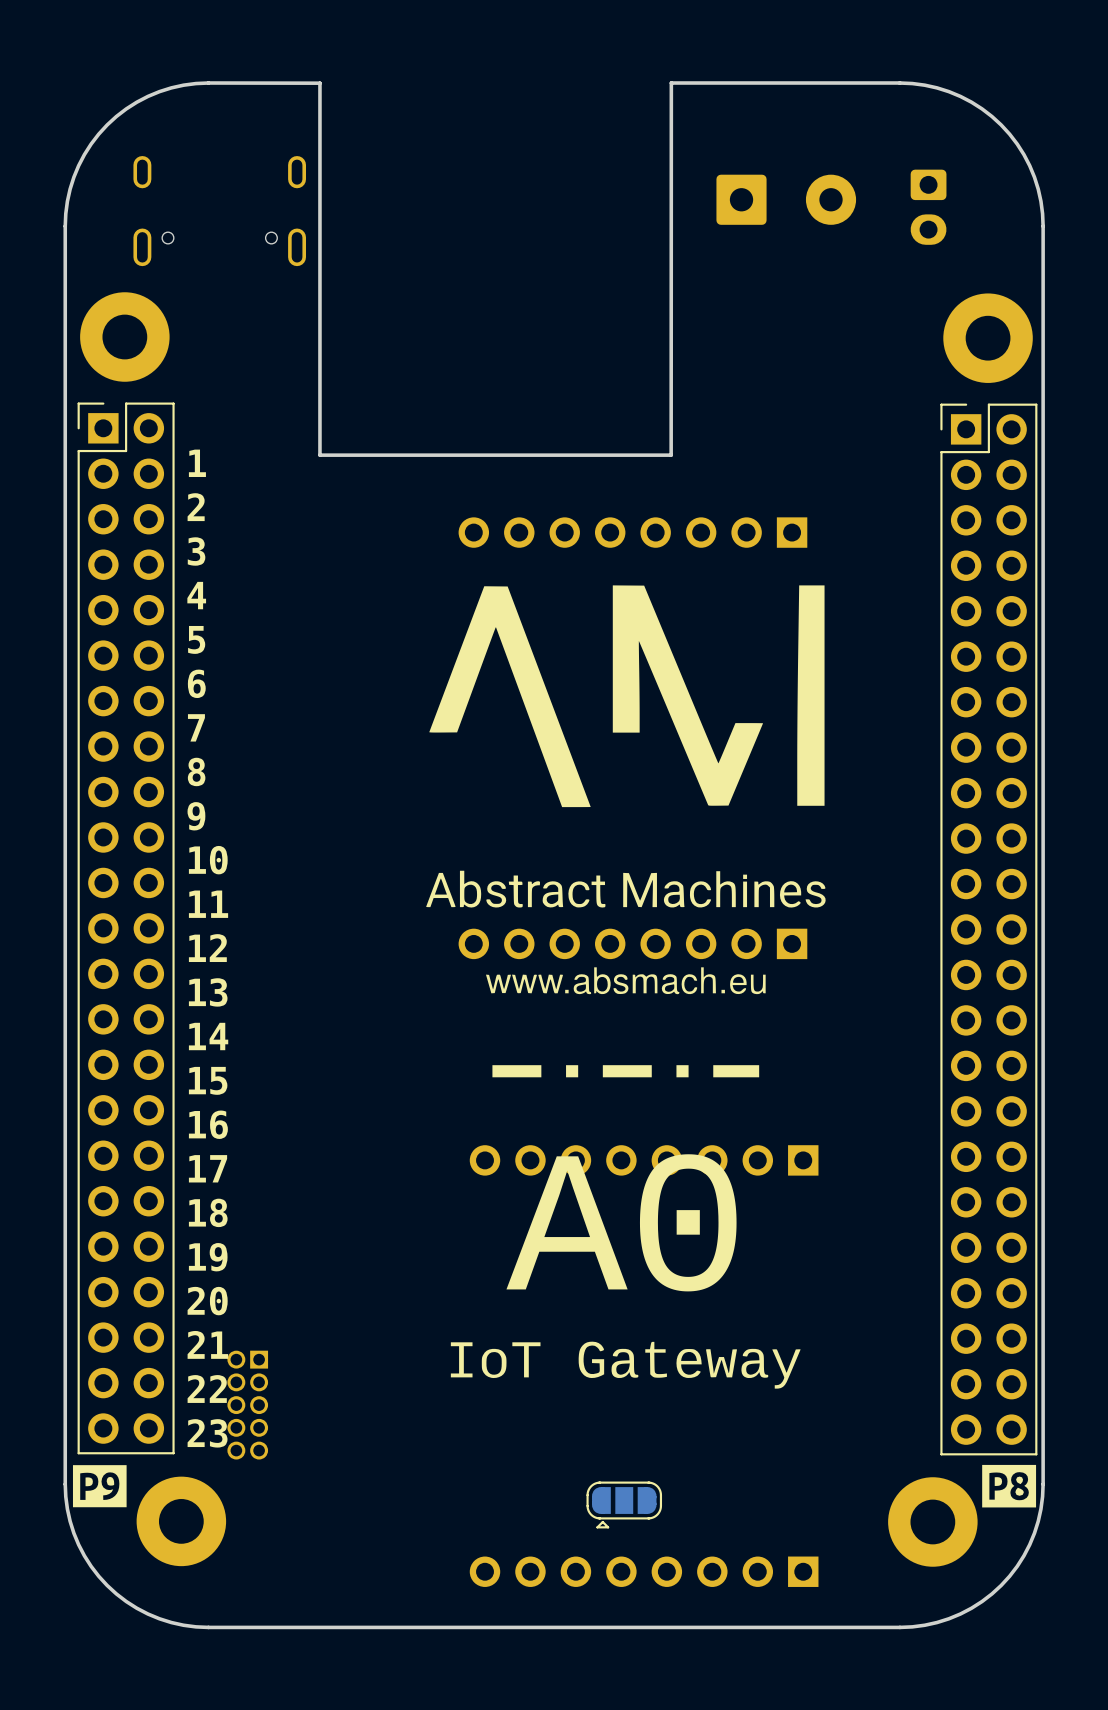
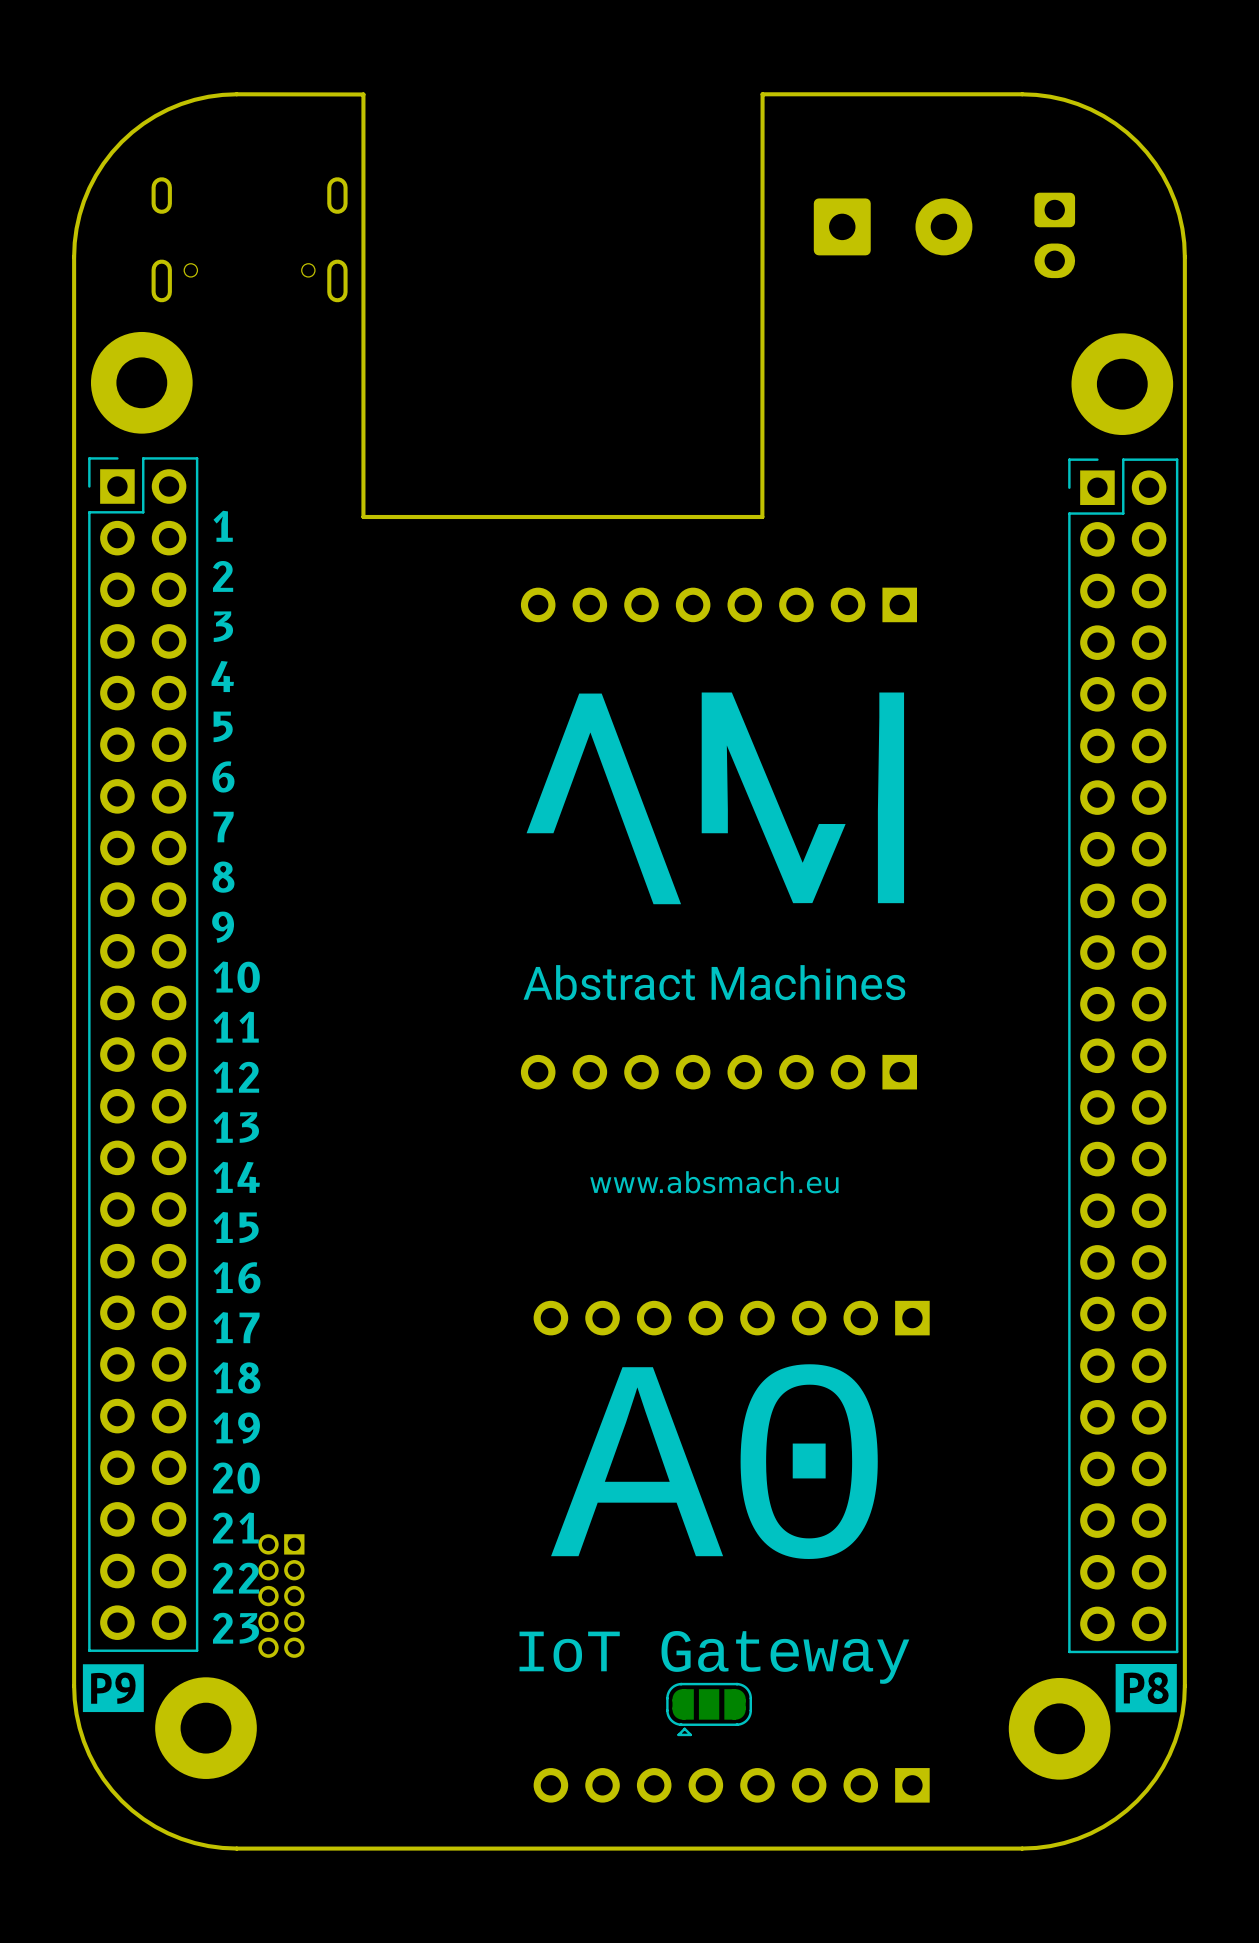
drawing: [426, 585, 826, 1389] -> none
drawing: none -> [526, 692, 846, 905]
drawing: none -> [877, 692, 905, 904]
drawing: none -> [523, 965, 906, 1001]
drawing: none -> [590, 1171, 839, 1194]
drawing: none -> [551, 1364, 878, 1559]
drawing: none -> [661, 1631, 910, 1684]
drawing: none -> [519, 1631, 620, 1672]

